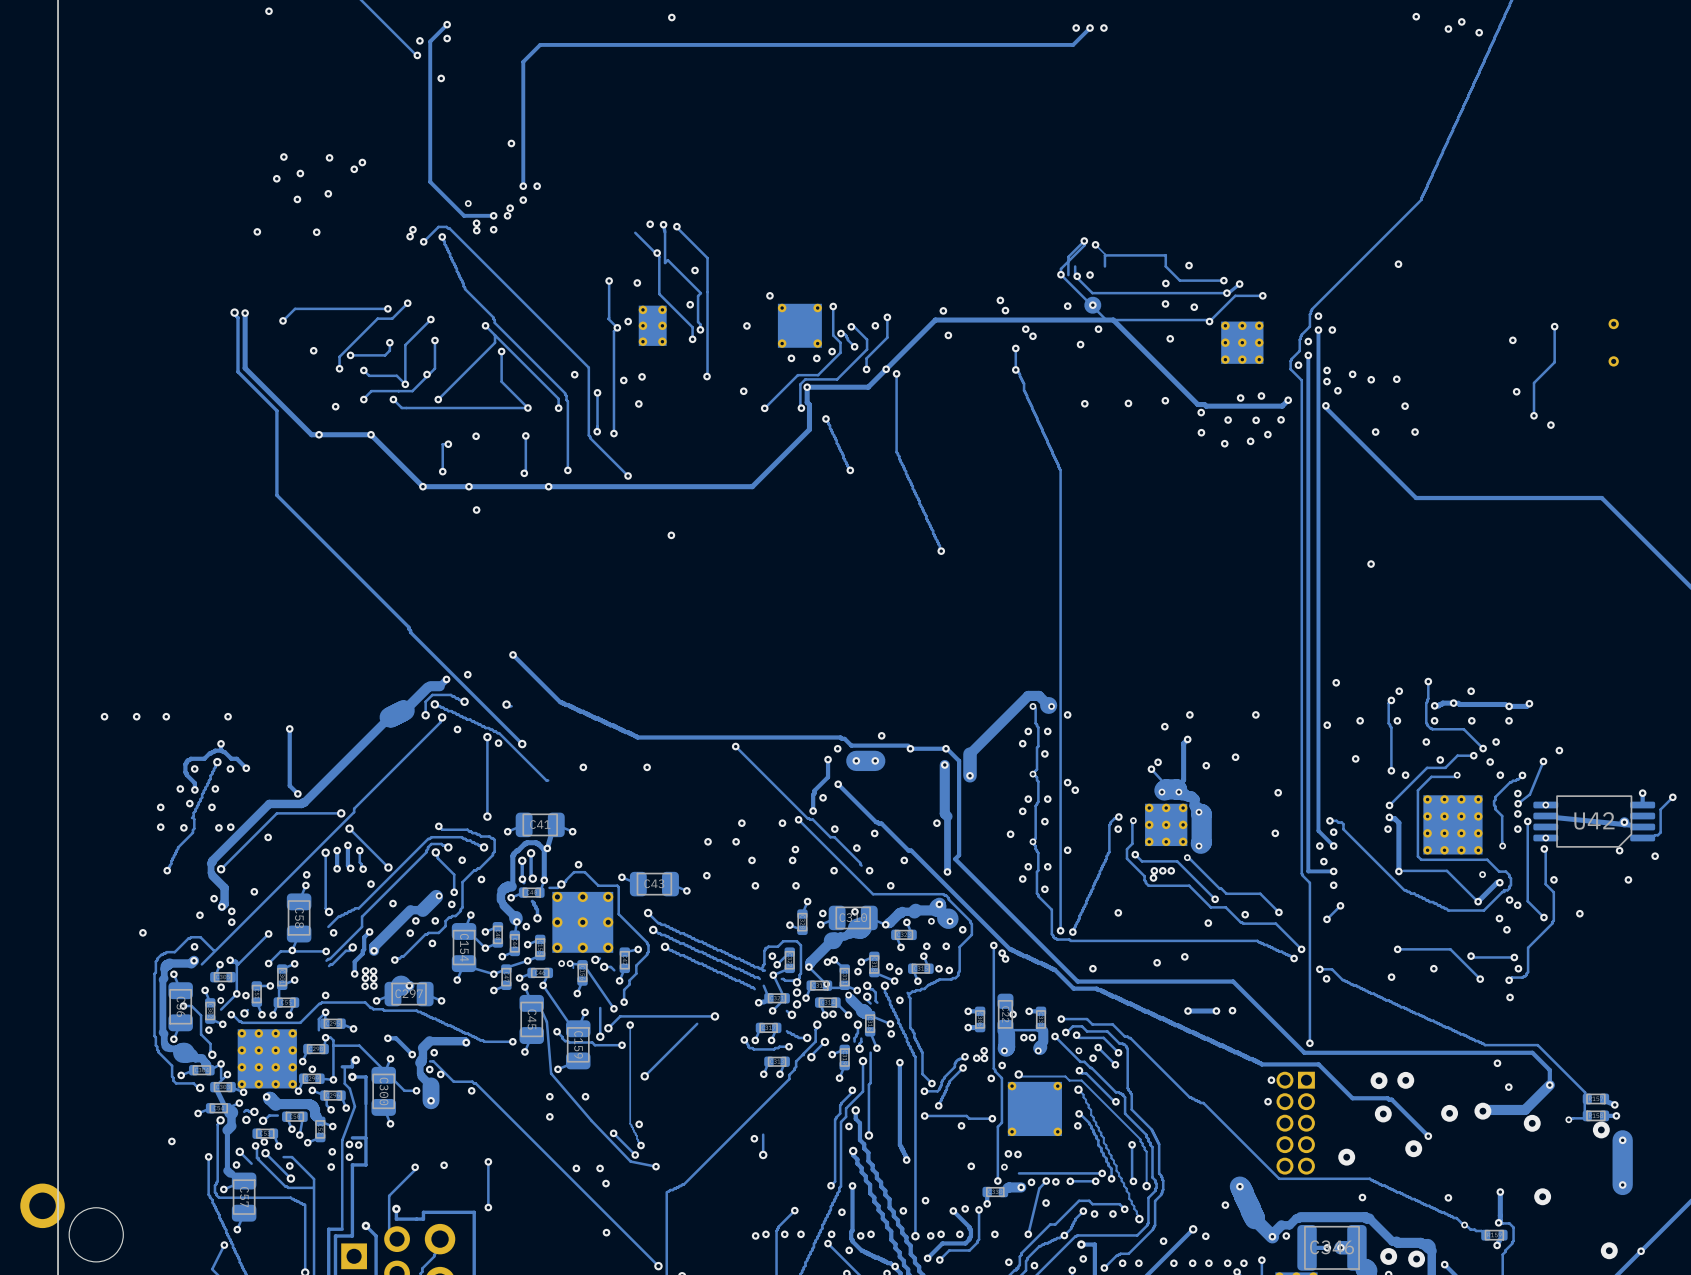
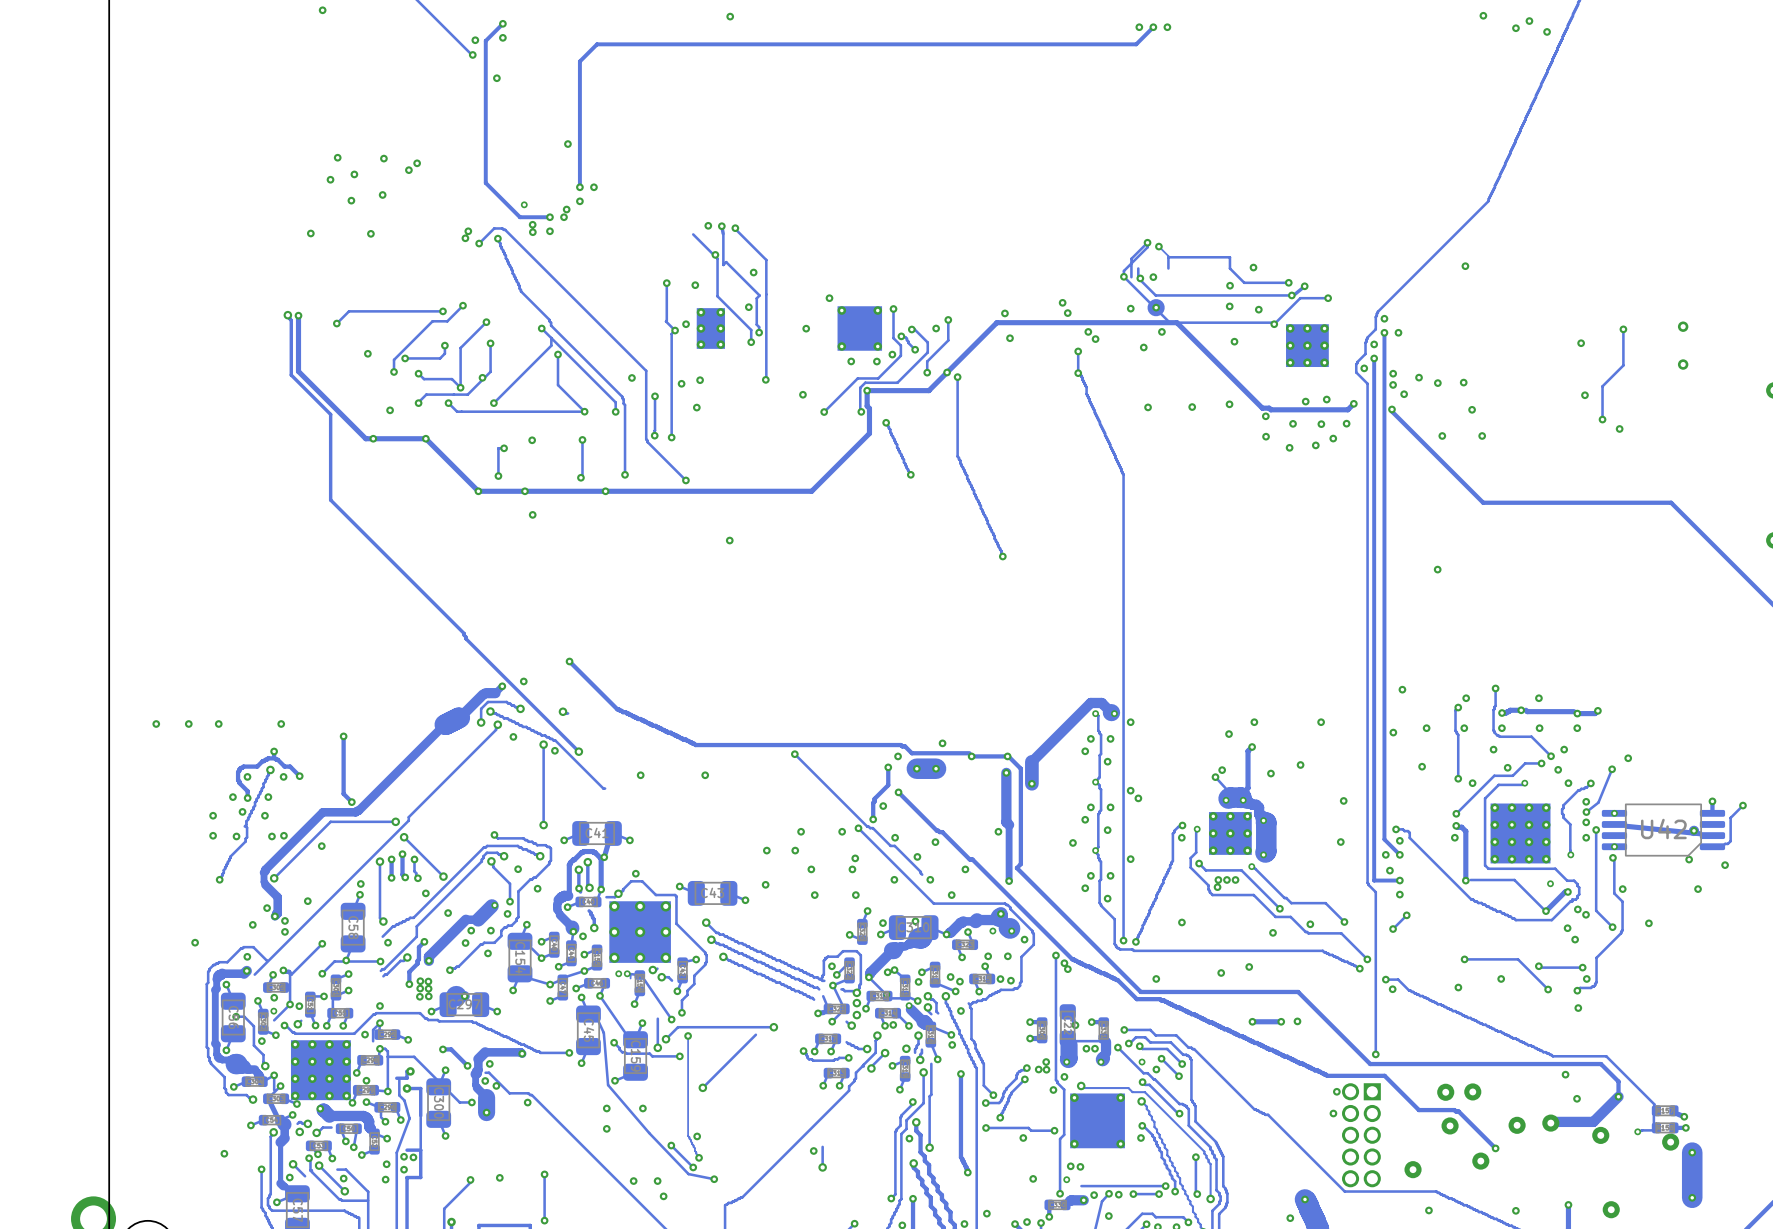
via: none -> (365, 1034)

